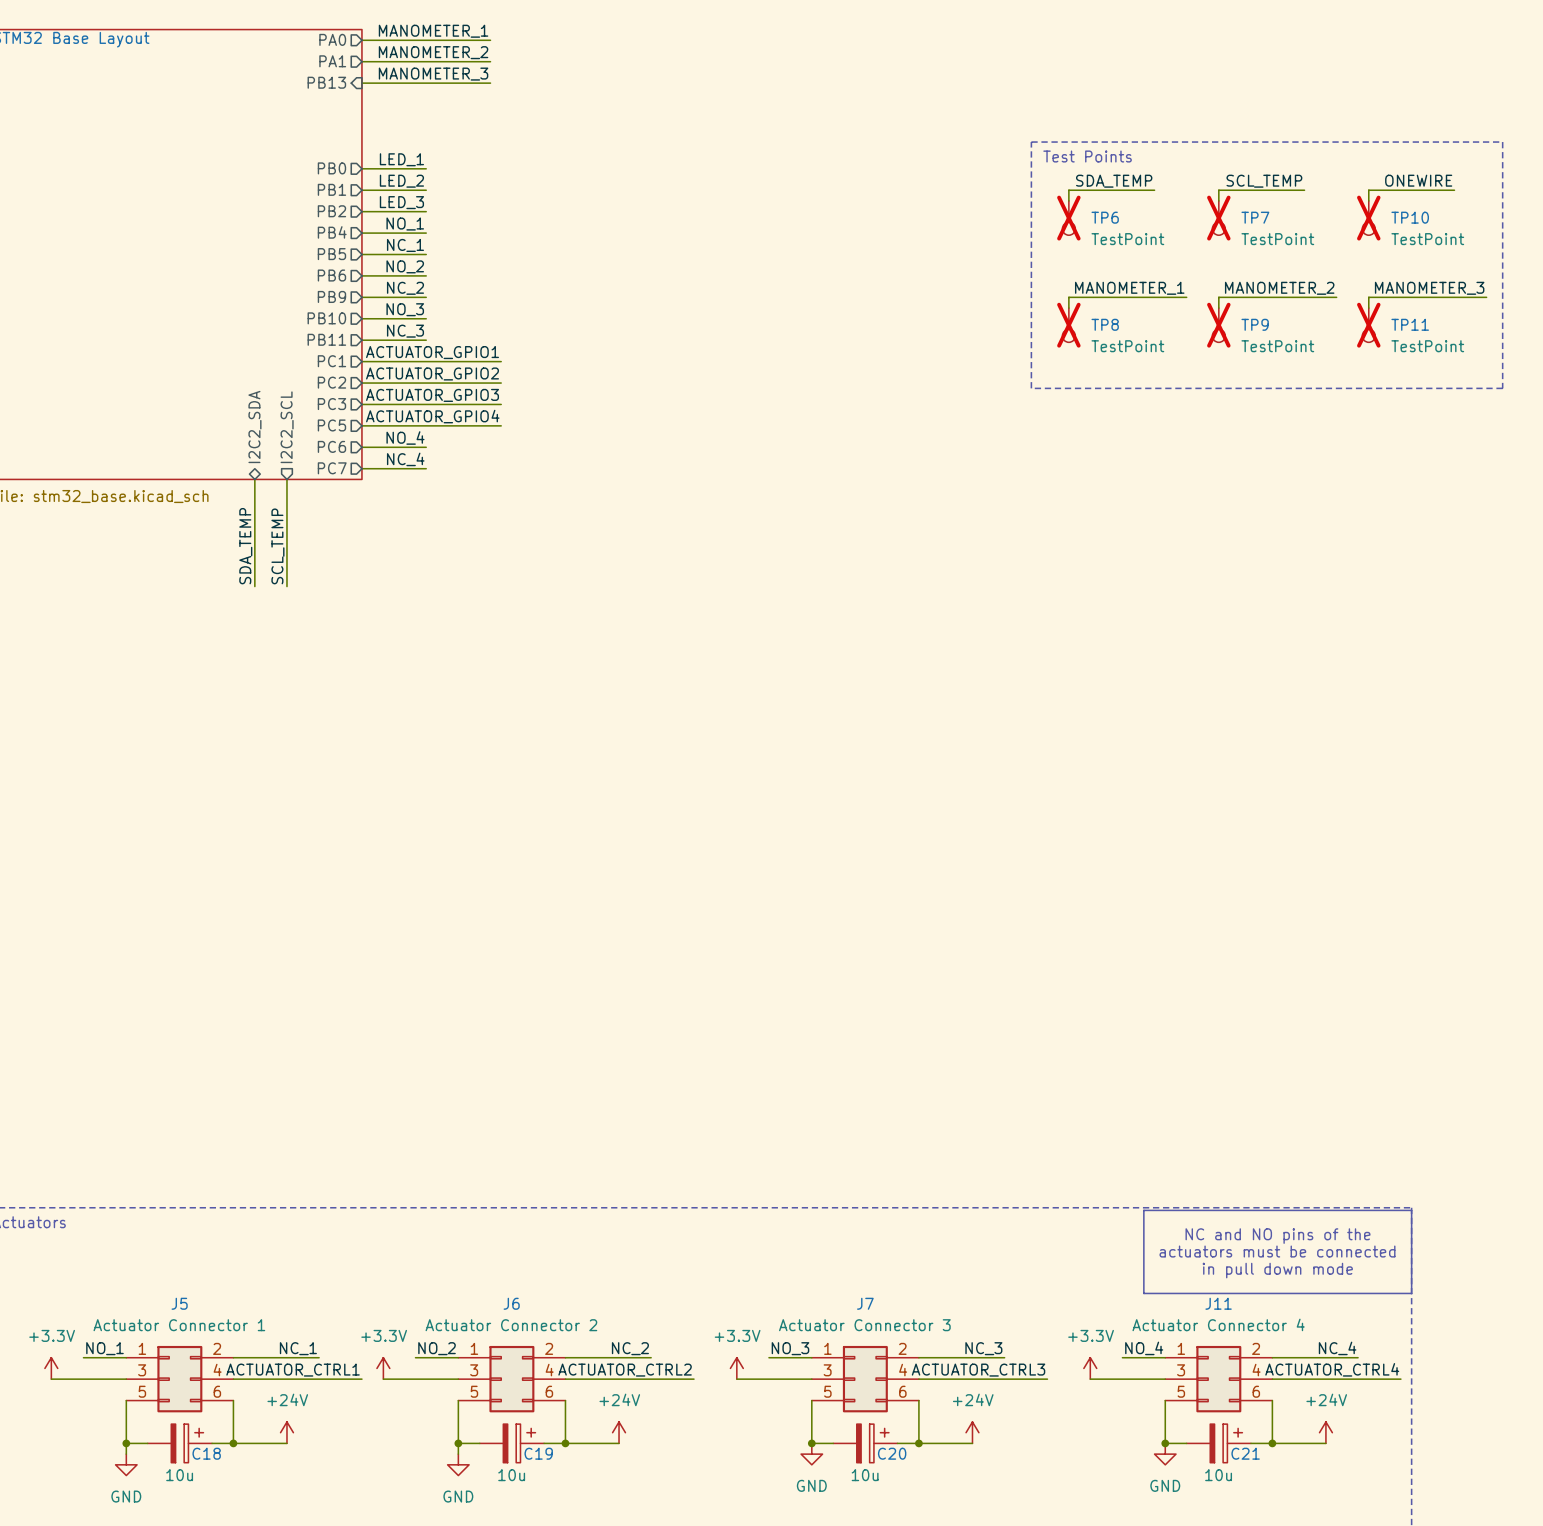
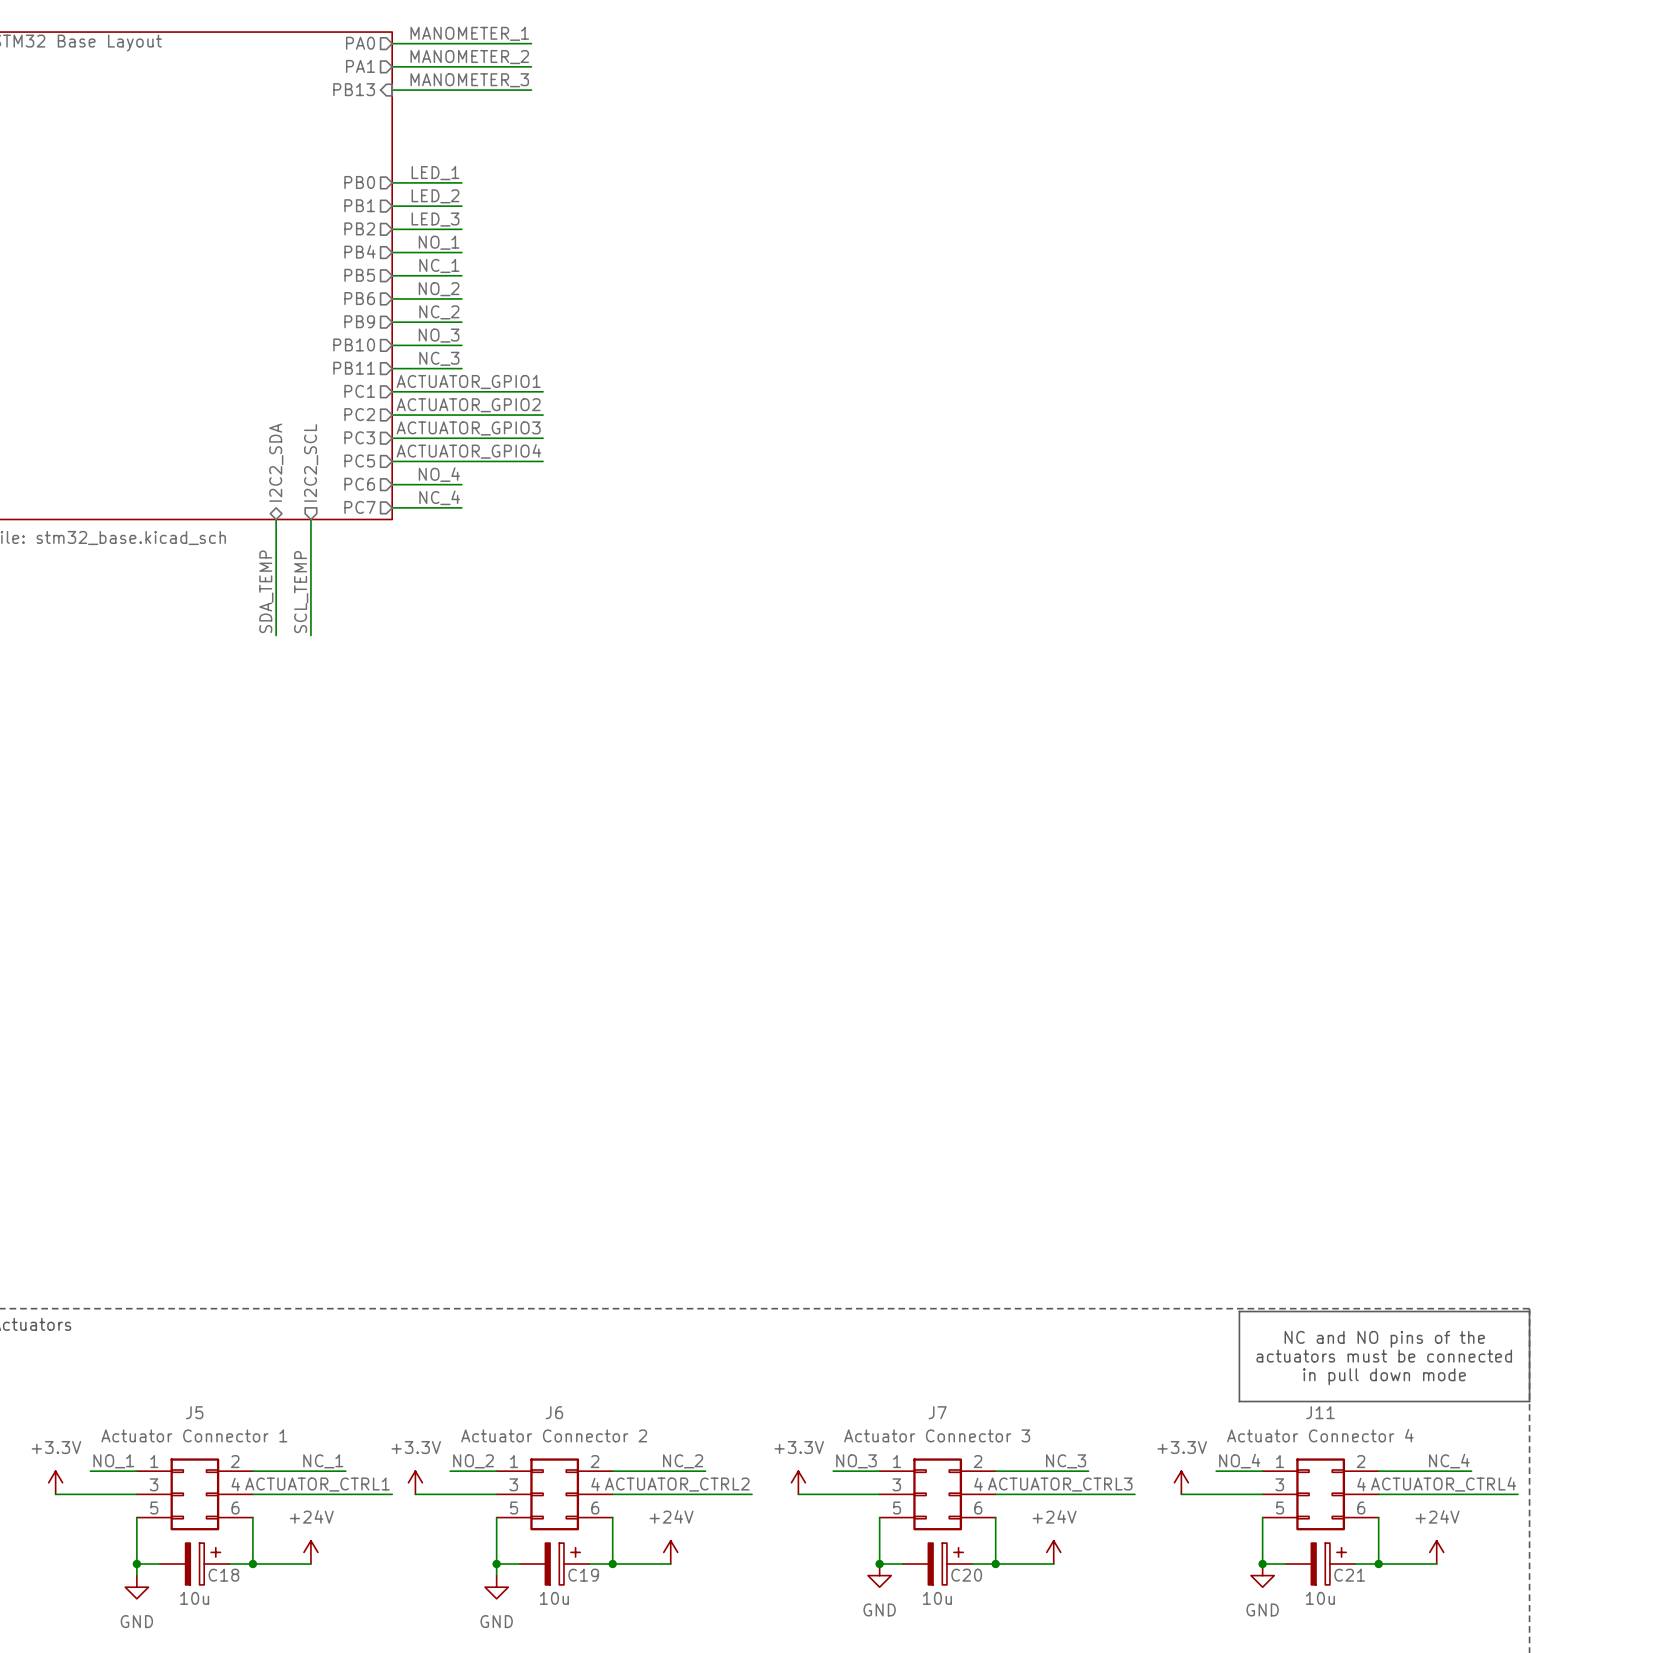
line: (1031, 142) (1502, 142) (1502, 388) (1031, 388) (1031, 142) -> none
text: Test Points (1087, 156) -> none
label: ONEWIRE (1418, 180) -> none
label: SDA_TEMP (1114, 181) -> none
label: SCL_TEMP (1264, 181) -> none
wire: (1154, 190) (1068, 190) (1068, 200) -> none
wire: (1304, 190) (1218, 190) (1218, 200) -> none
wire: (1454, 190) (1368, 190) (1368, 200) -> none
TP6: TestPoint (1068, 218) -> none
TP7: TestPoint (1218, 218) -> none
TP10: TestPoint (1368, 218) -> none
label: MANOMETER_1 (1129, 288) -> none
label: MANOMETER_2 (1279, 288) -> none
label: MANOMETER_3 (1429, 288) -> none
wire: (1186, 297) (1068, 297) (1068, 308) -> none
wire: (1336, 297) (1218, 297) (1218, 308) -> none
wire: (1486, 297) (1368, 297) (1368, 308) -> none
TP8: TestPoint (1068, 325) -> none
TP9: TestPoint (1218, 325) -> none
TP11: TestPoint (1368, 325) -> none

